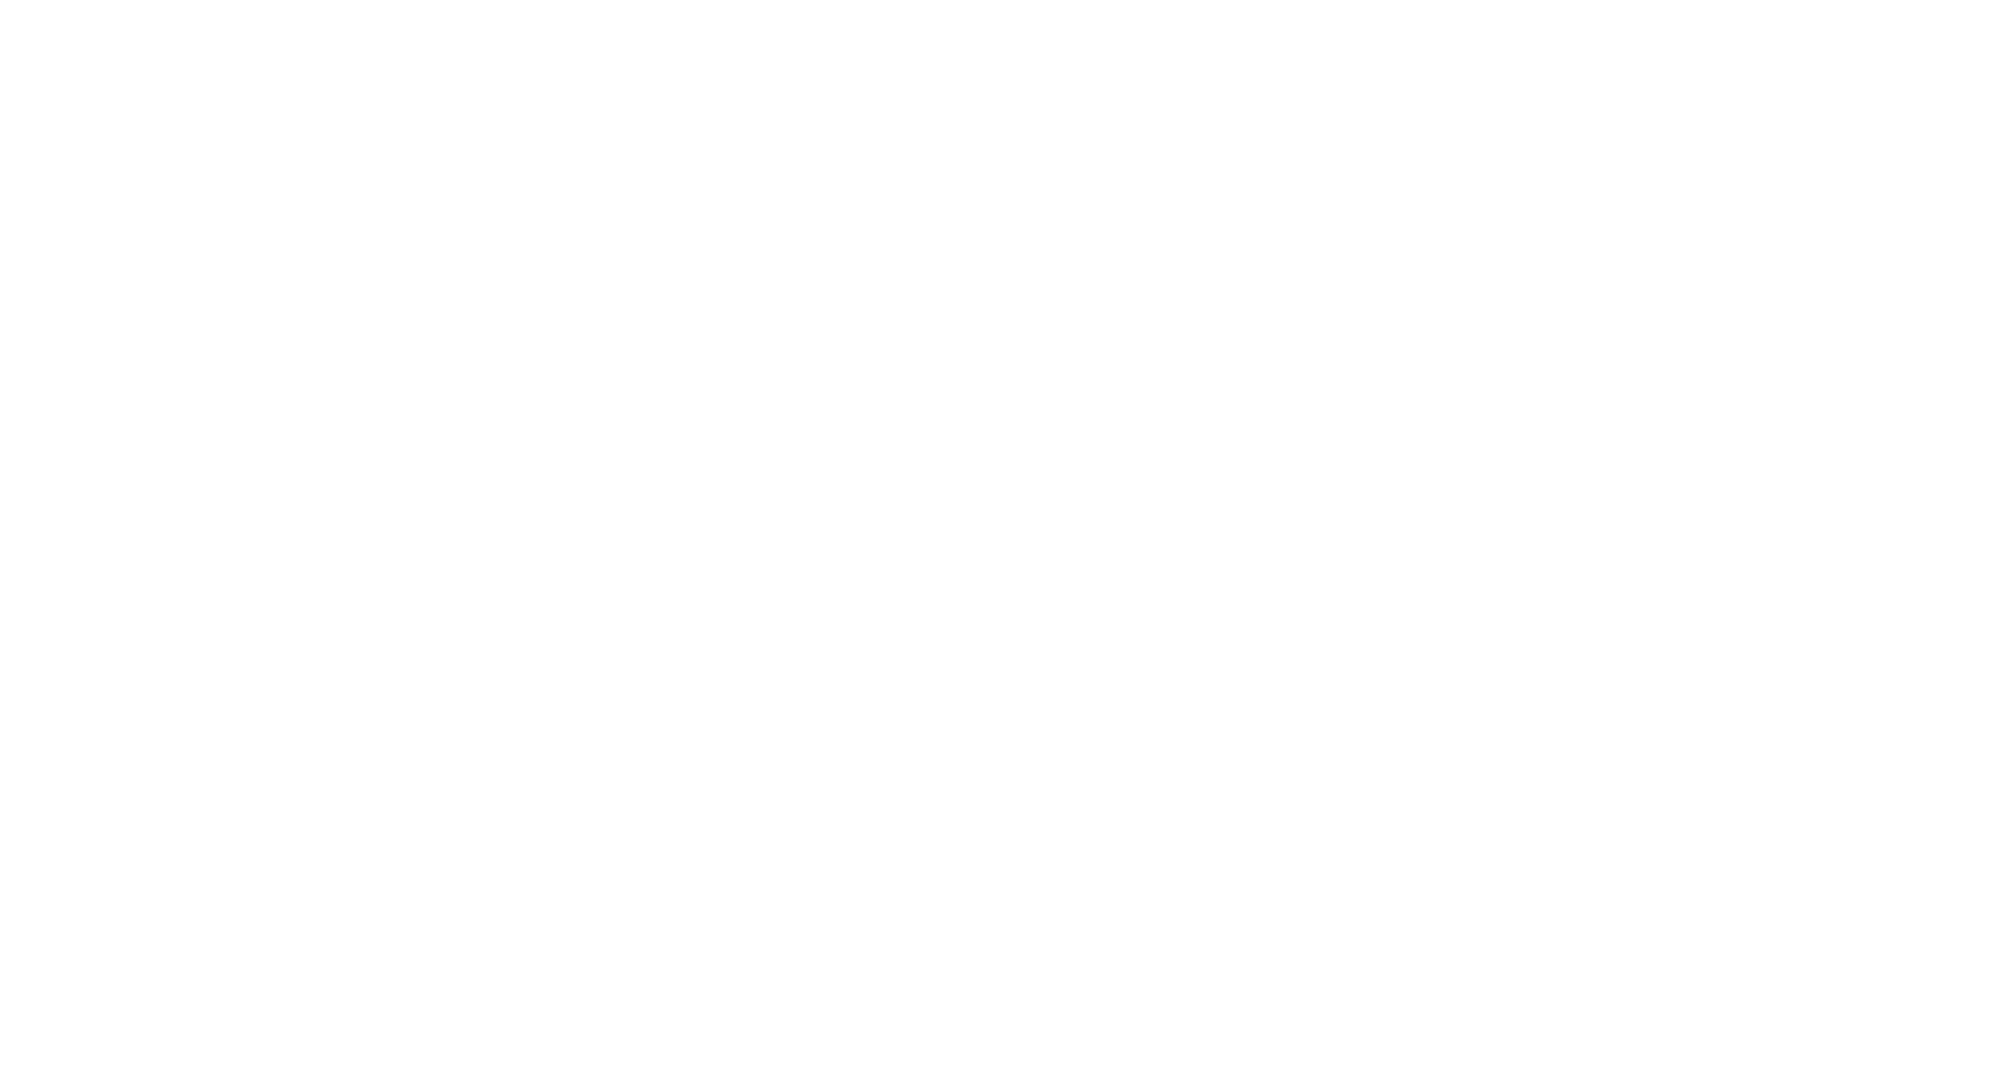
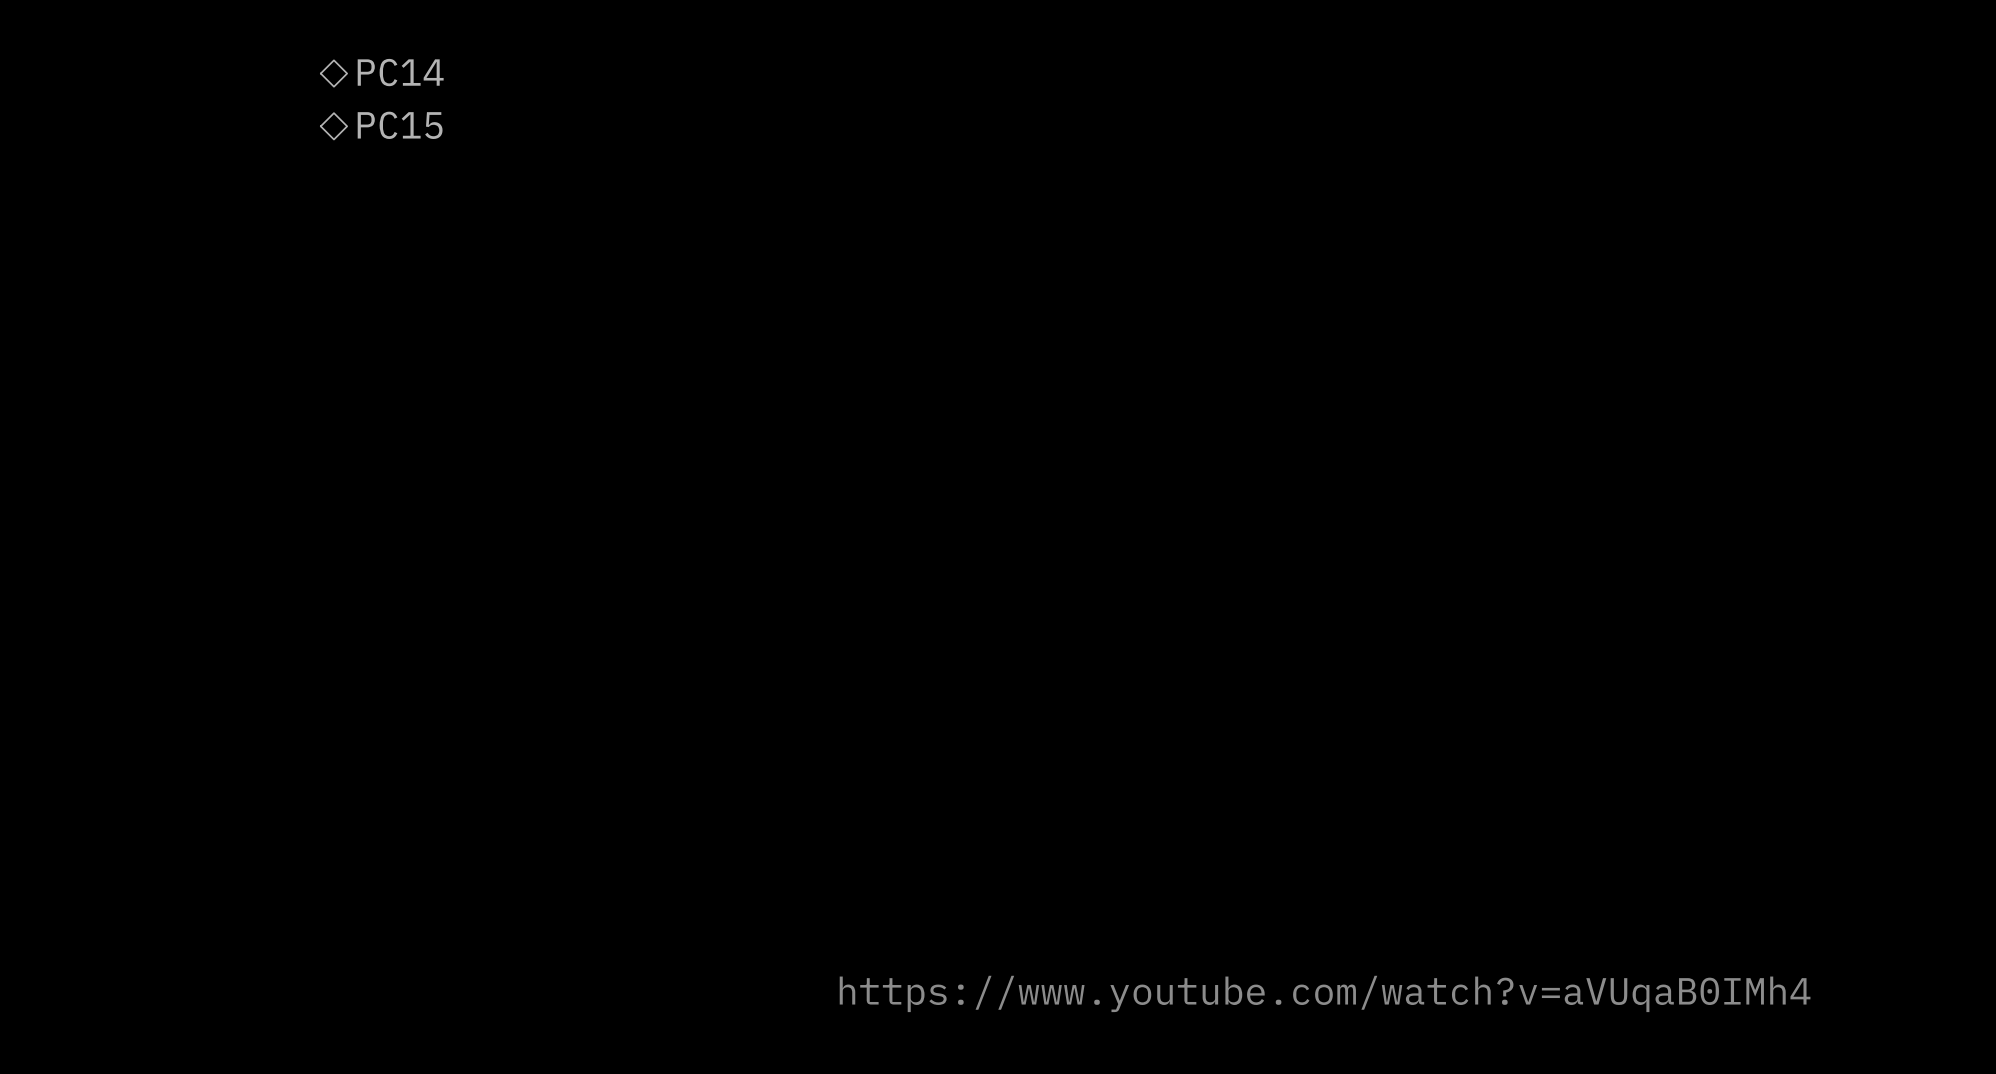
hierarchical label: none -> PC14 (400, 72)
hierarchical label: none -> PC15 (400, 125)
text: none -> https://www.youtube.com/watch?v=aVUqaB0IMh4 (1325, 993)

